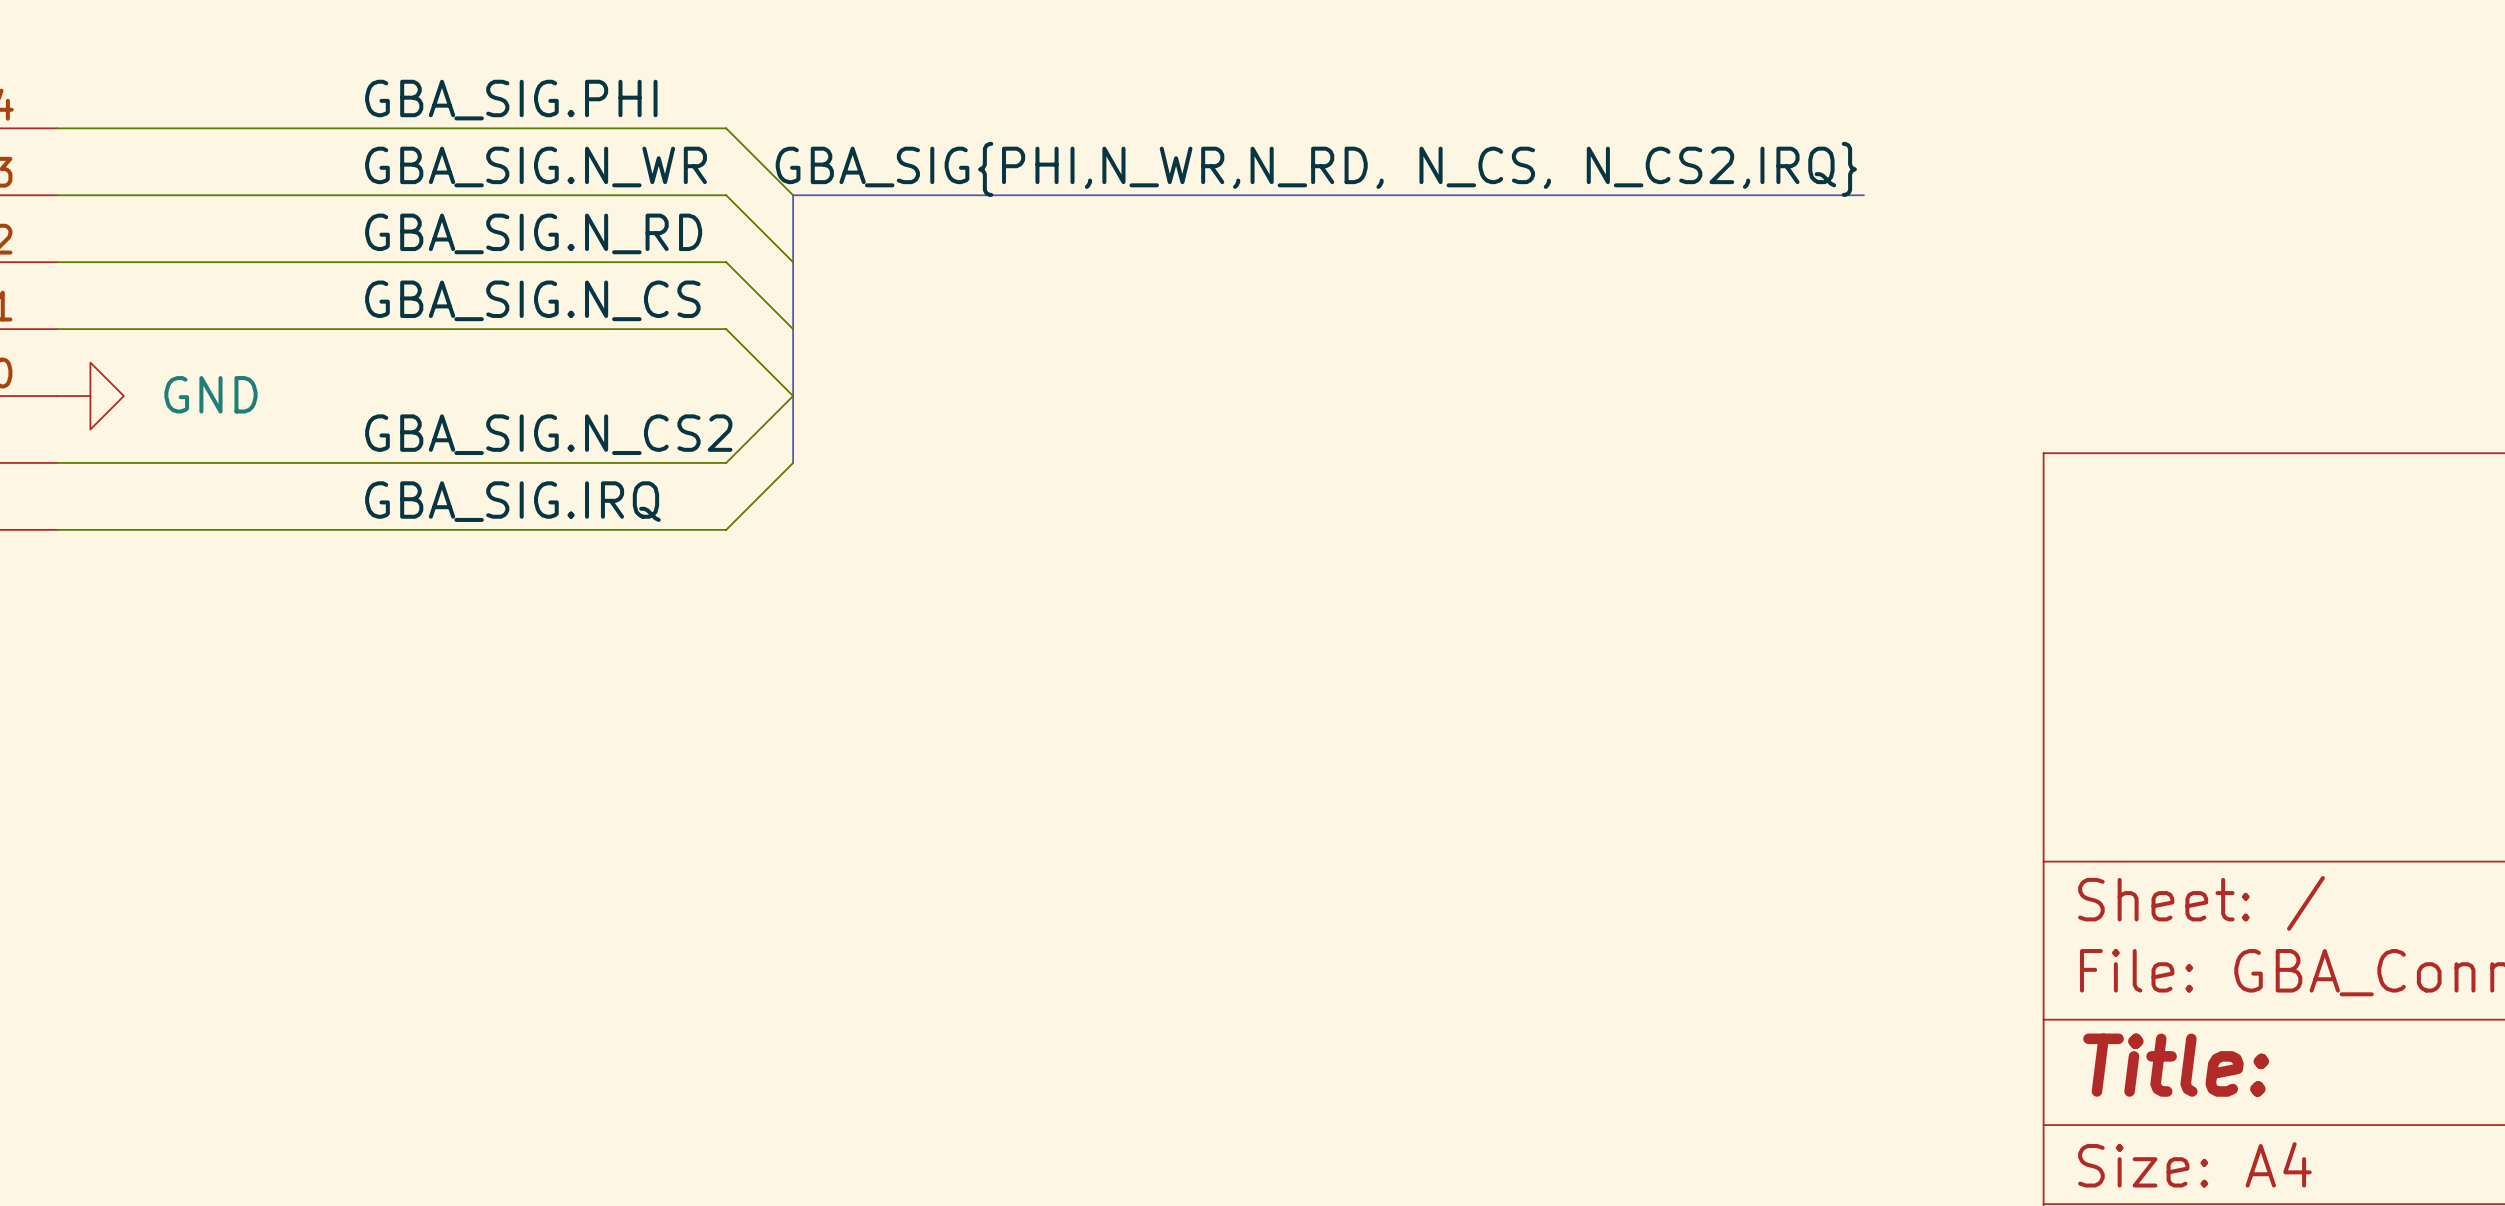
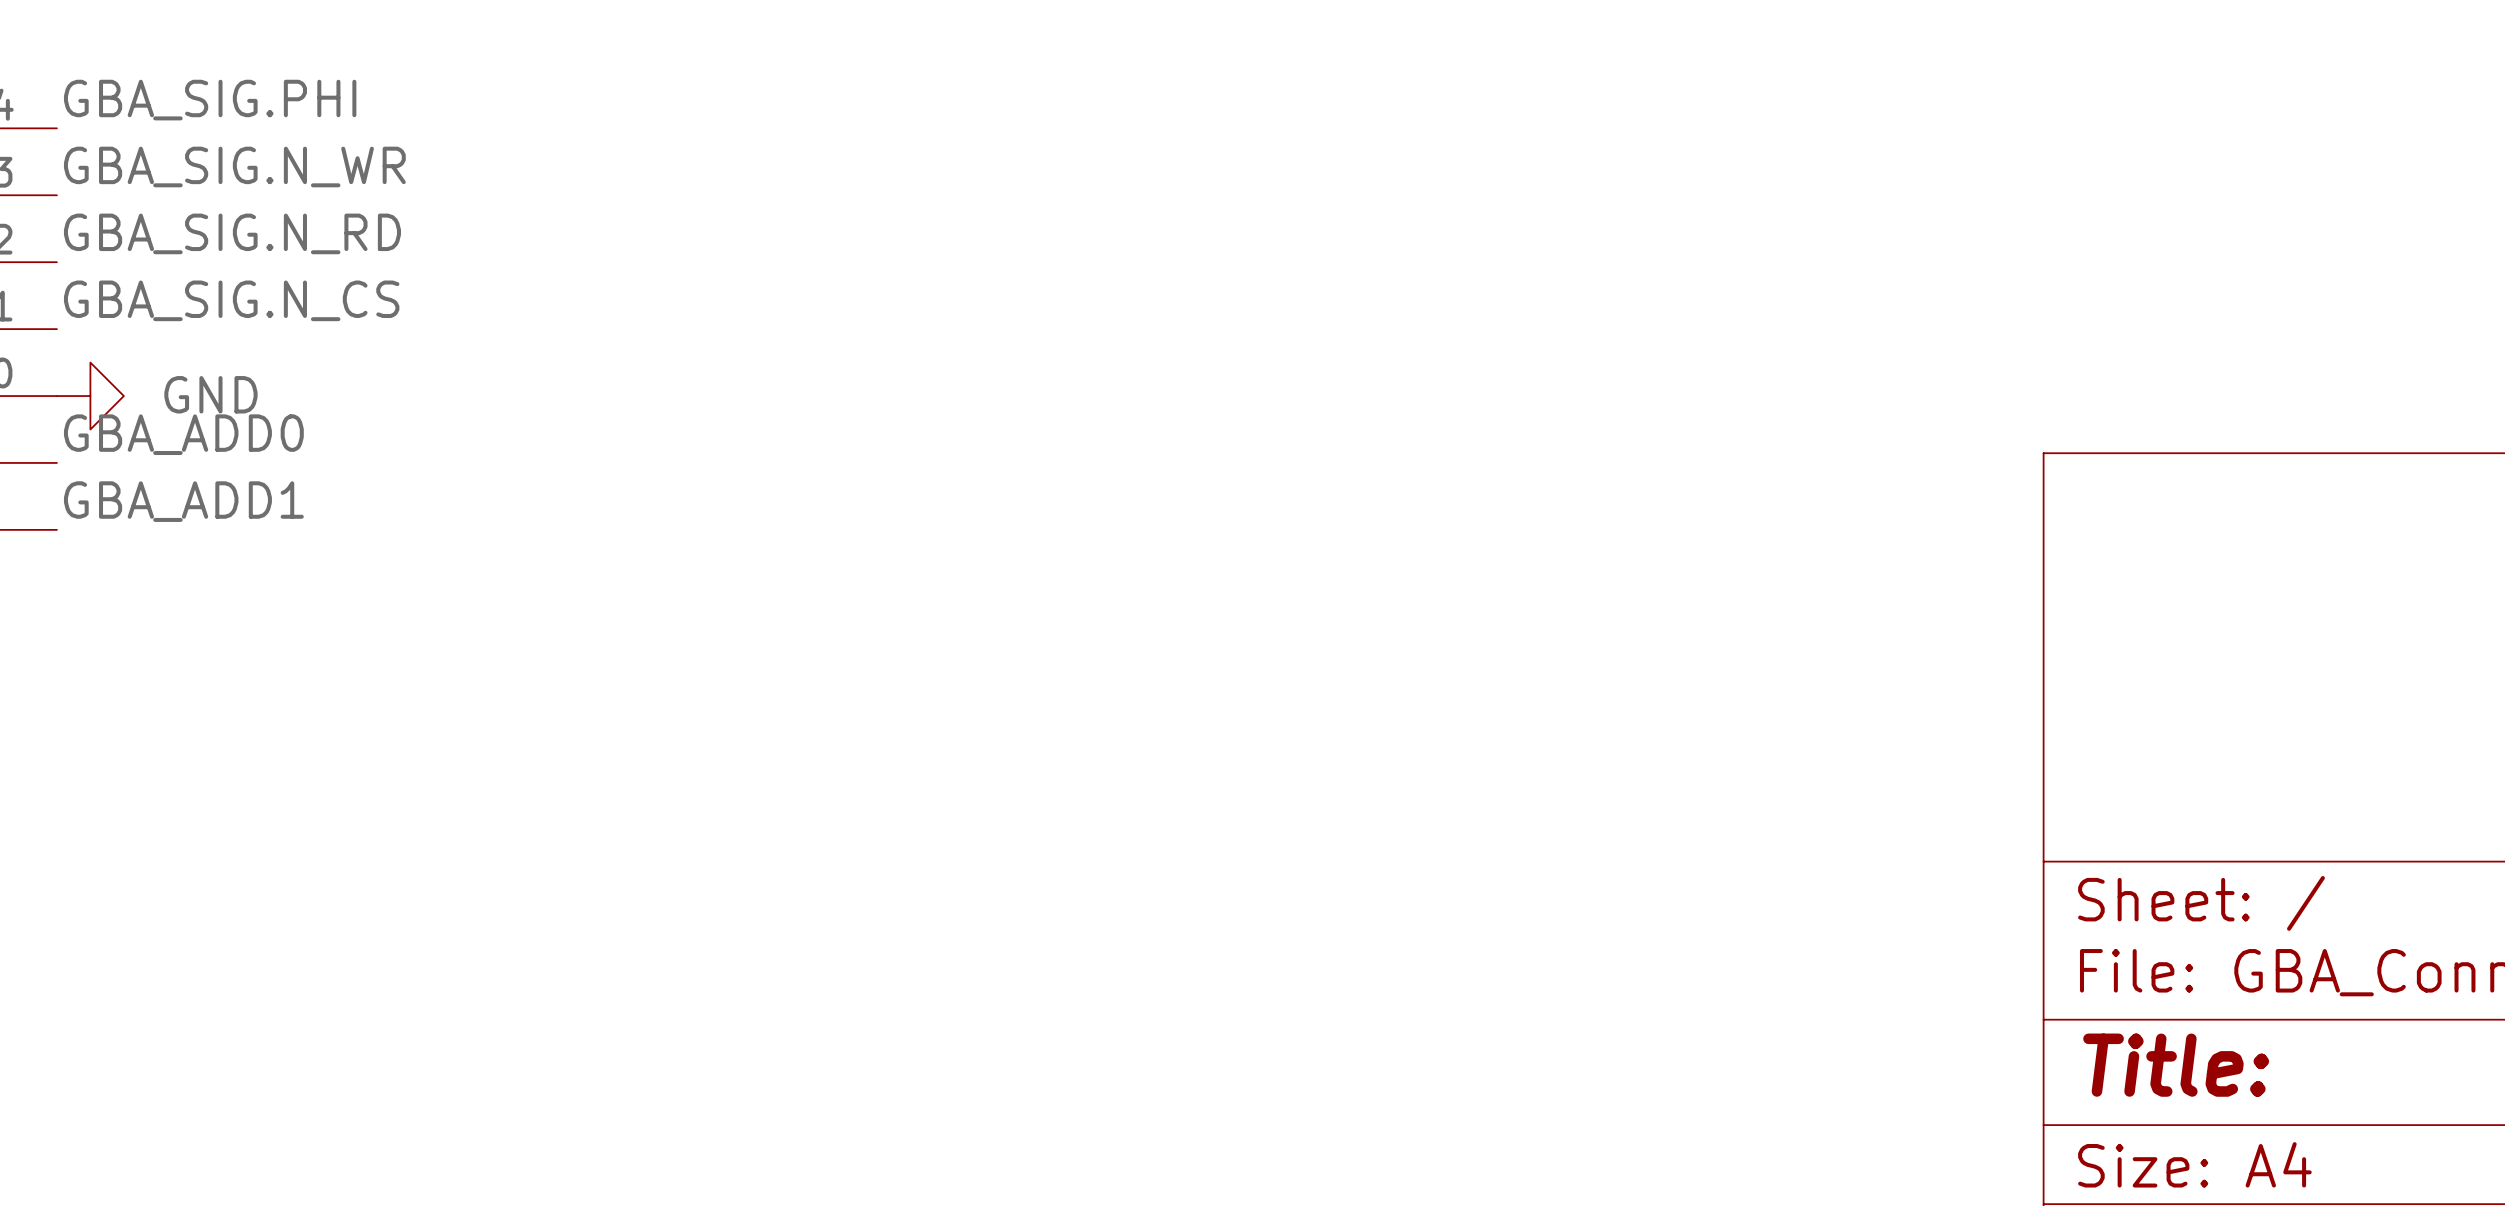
label position: GBA_SIG.PHI (511, 100) -> GBA_SIG.PHI (210, 100)
wire: (56, 128) (726, 128) (793, 195) -> none
label position: GBA_SIG.N_WR (536, 166) -> GBA_SIG.N_WR (234, 166)
label: GBA_SIG{PHI,N_WR,N_RD, N_CS, N_CS2,IRQ} (1316, 169) -> none
wire: (56, 195) (726, 195) (793, 262) -> none
bus: (1863, 195) (793, 195) (793, 462) -> none
label position: GBA_SIG.N_RD (533, 233) -> GBA_SIG.N_RD (232, 233)
wire: (56, 262) (726, 262) (793, 329) -> none
label position: GBA_SIG.N_CS (532, 300) -> GBA_SIG.N_CS (231, 300)
wire: (56, 329) (726, 329) (793, 396) (726, 462) (56, 462) -> none
label: none -> GBA_ADD0 (183, 434)
label: GBA_SIG.N_CS2 (548, 434) -> none
wire: (793, 462) (726, 529) (56, 529) -> none
label: none -> GBA_ADD1 (183, 501)
label: GBA_SIG.IRQ (512, 501) -> none

